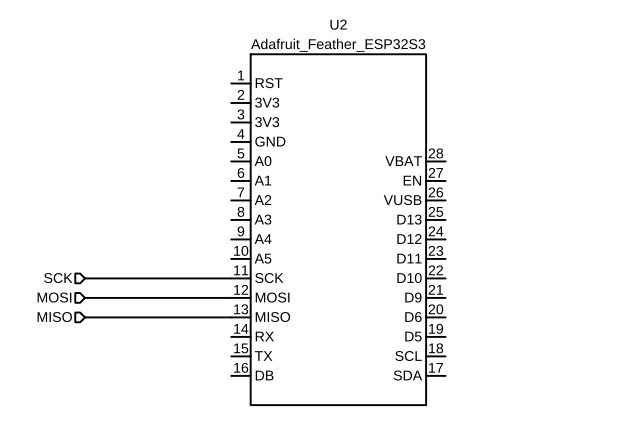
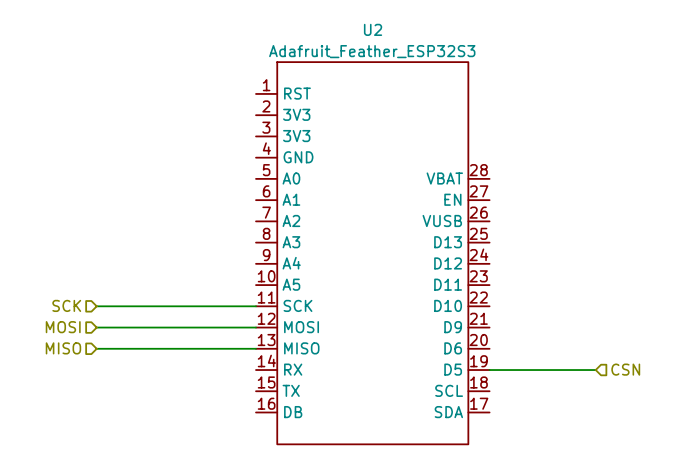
wire: none -> (489, 370) (595, 370)
hierarchical label: none -> CSN (625, 369)

